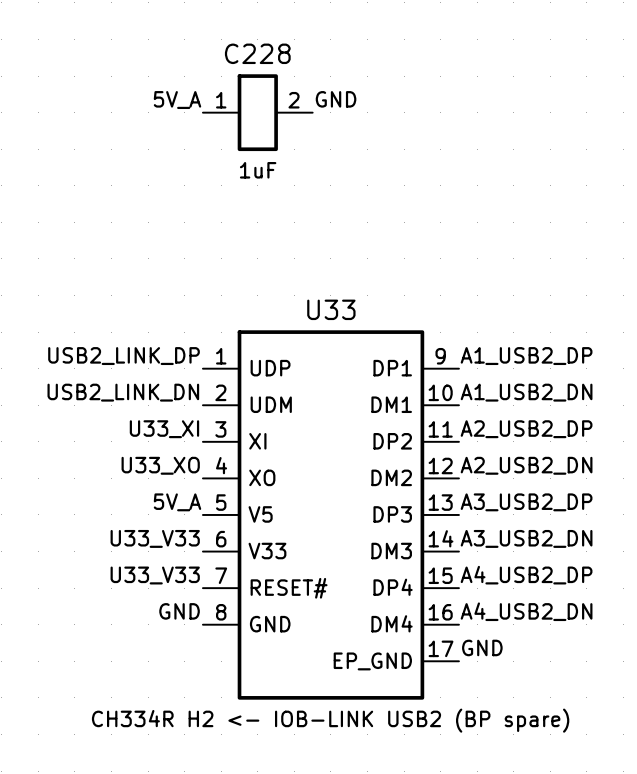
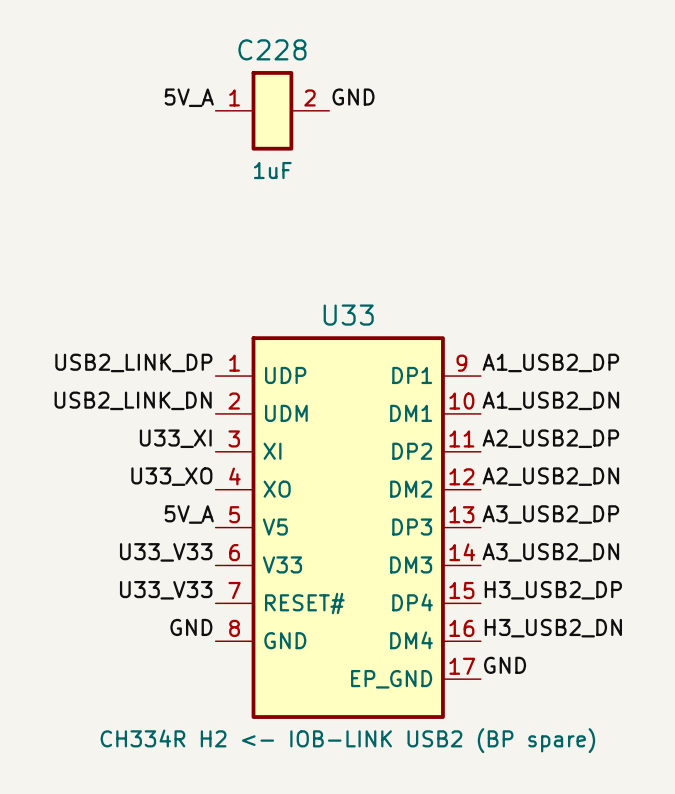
label: A4_USB2_DP (526, 575) -> H3_USB2_DP (553, 590)
label: A4_USB2_DN (526, 611) -> H3_USB2_DN (553, 628)

